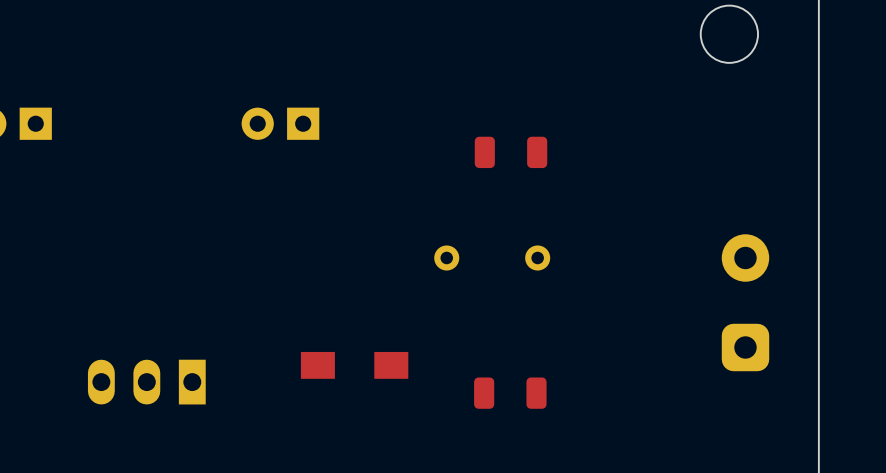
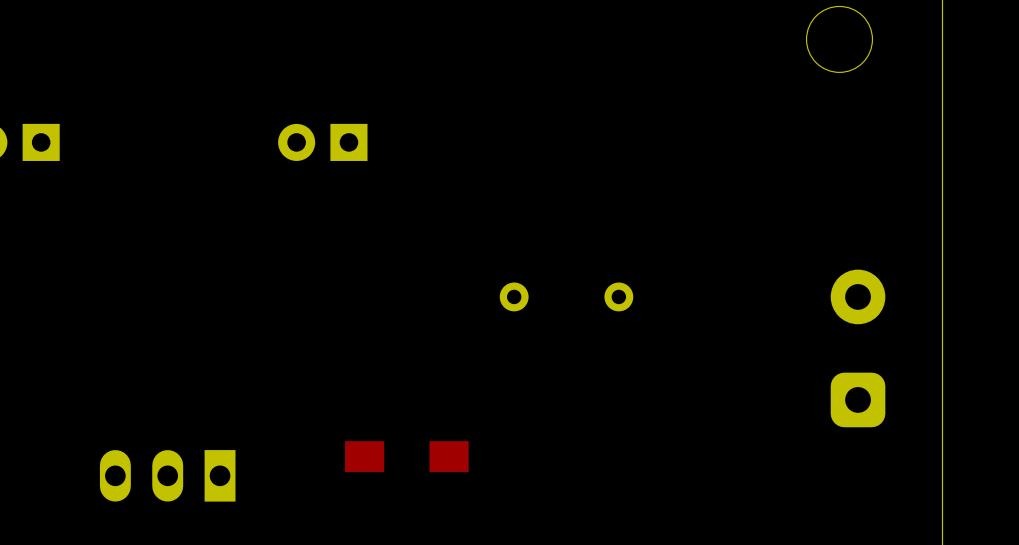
part: (511, 152) -> none
part position: (354, 365) -> (406, 456)
part position: (146, 382) -> (167, 475)
part: (510, 393) -> none

